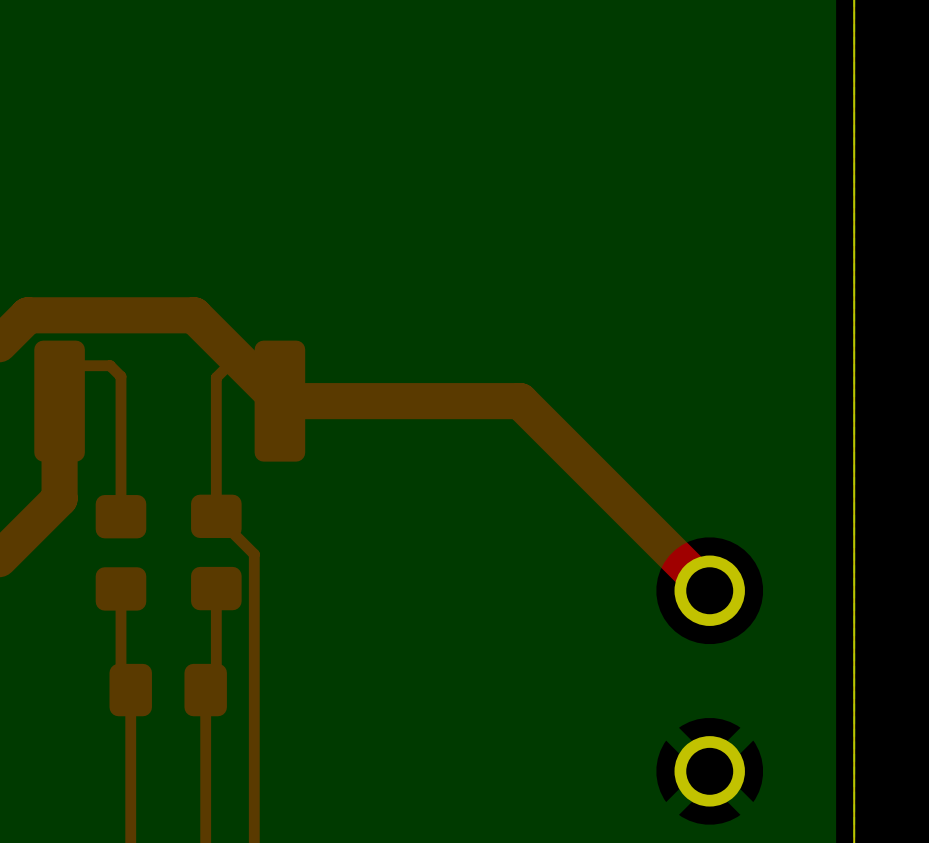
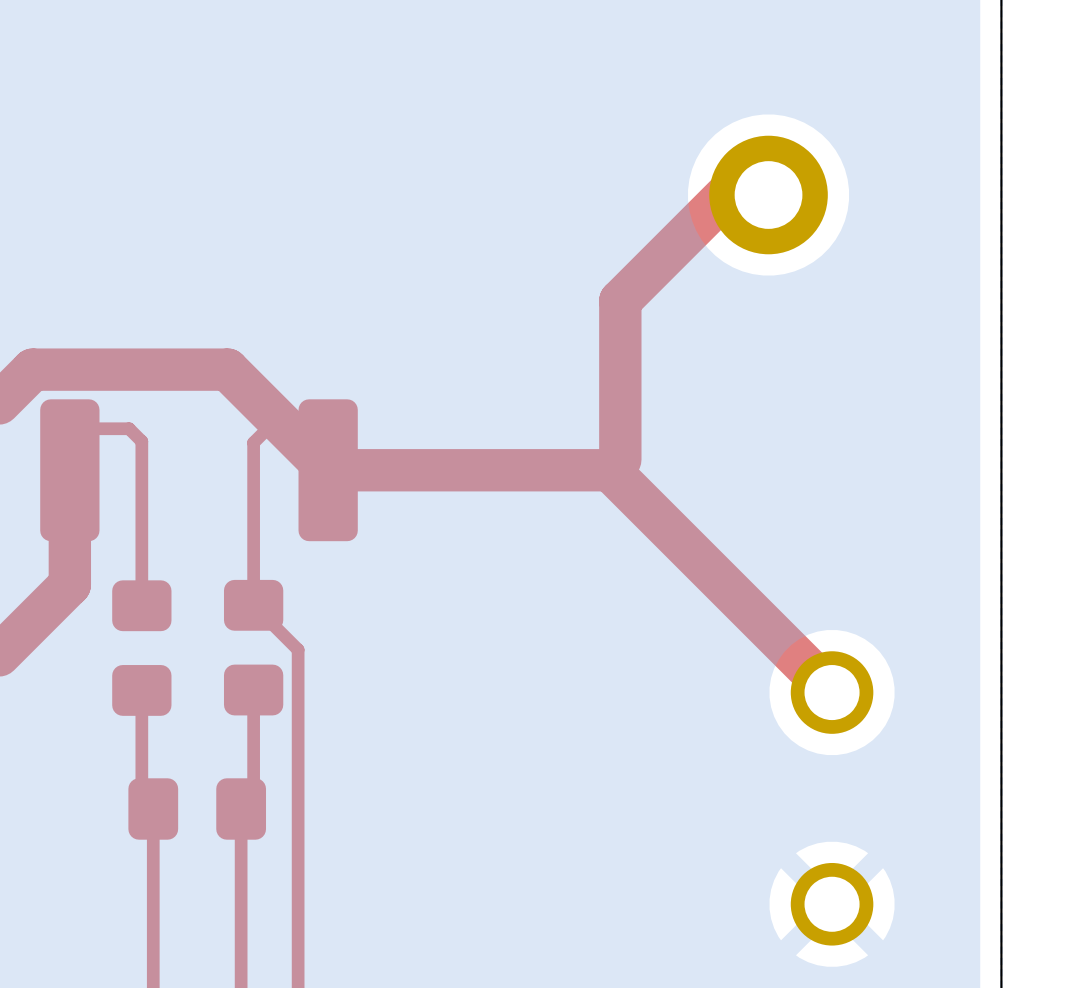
top track: none -> (726, 195) (620, 300) (620, 459)
part: none -> (768, 195)

